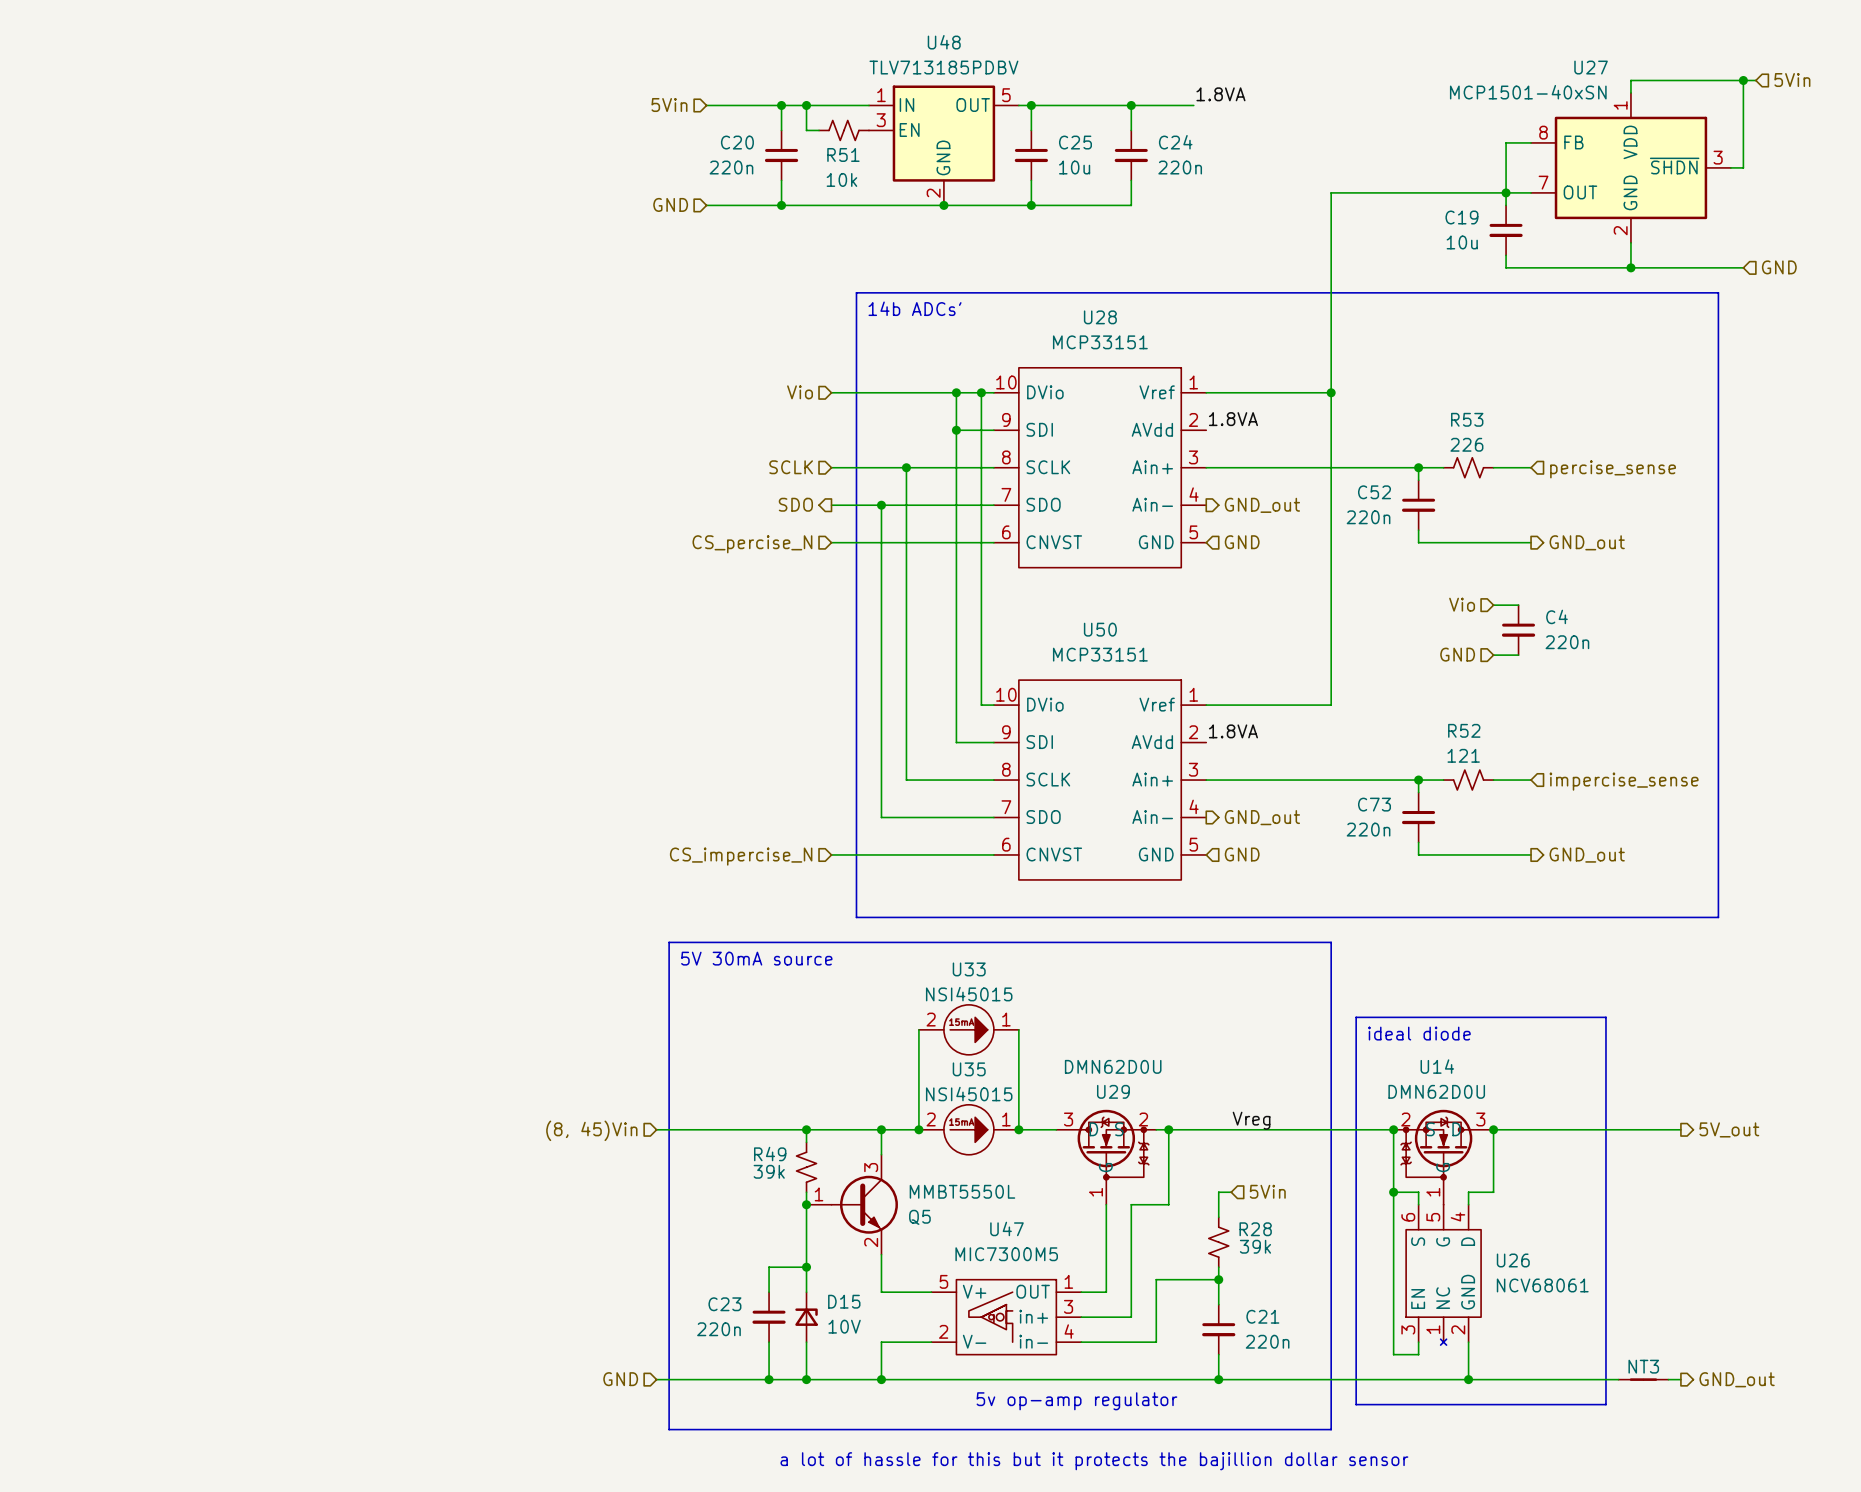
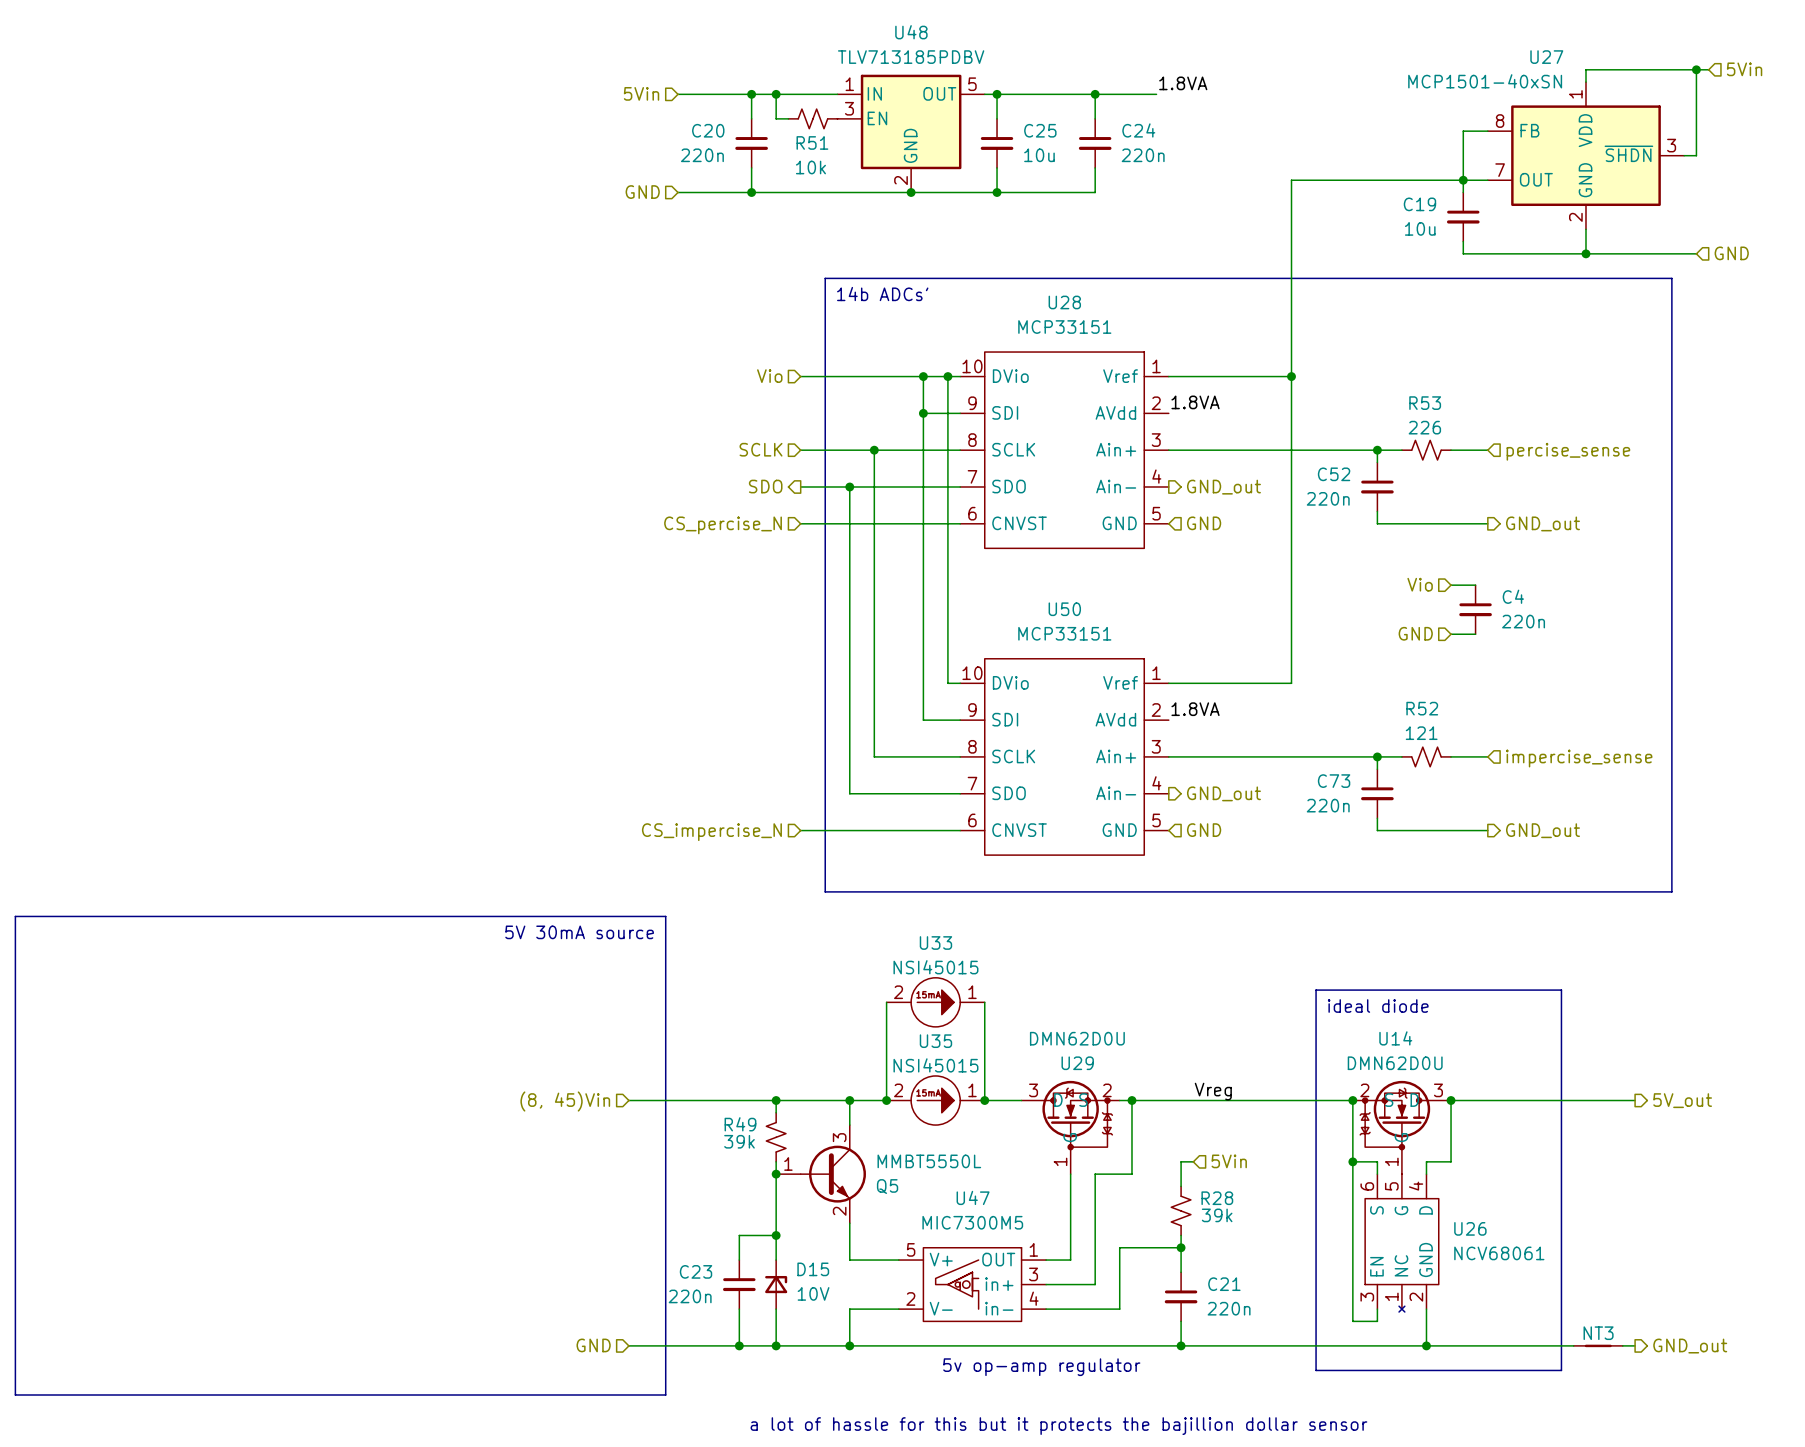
line: (669, 942) (669, 1429) -> (641, 916) (15, 916) (15, 1395) (641, 1395)
line: (694, 942) (1331, 942) (1331, 1429) (694, 1429) -> (665, 916) (665, 1395)
text position: 5V 30mA source (756, 958) -> 5V 30mA source (579, 932)

